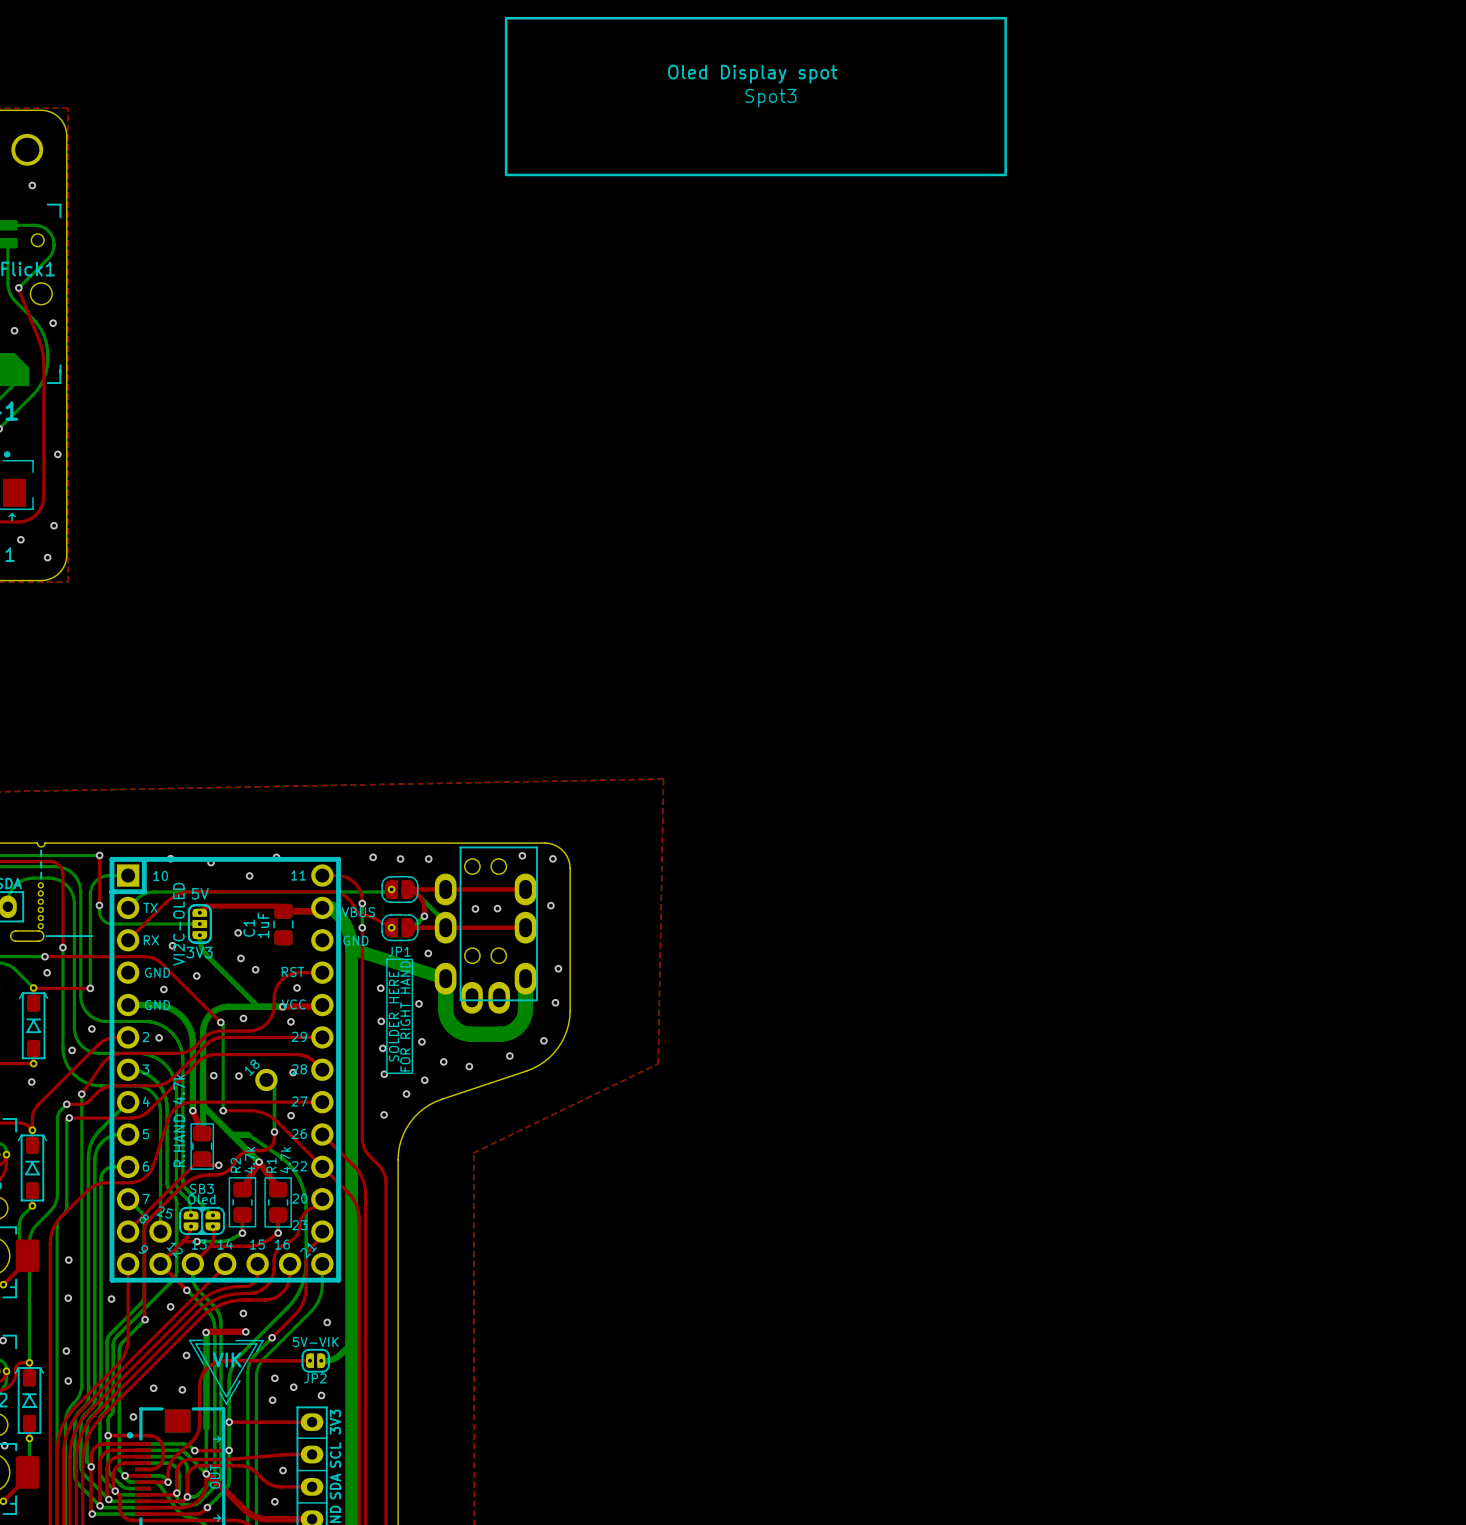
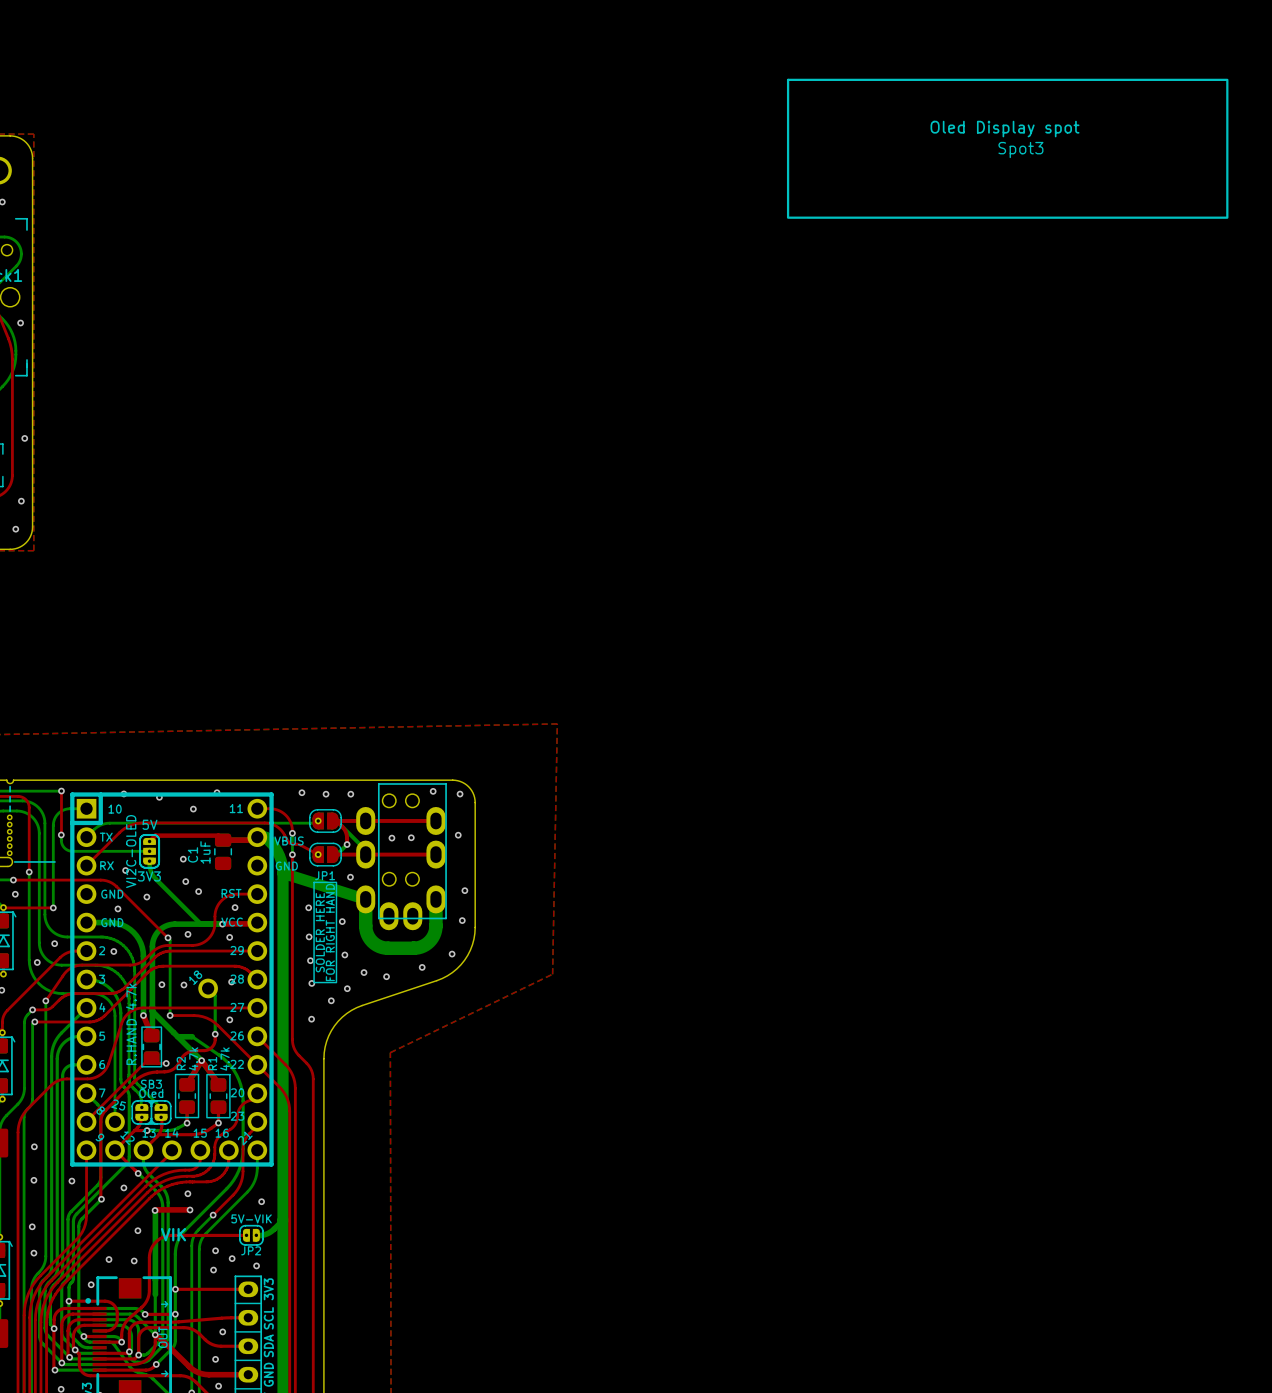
Spot3 position: (755, 96) -> (1007, 148)
drawing: [189, 1339, 264, 1405] -> none

